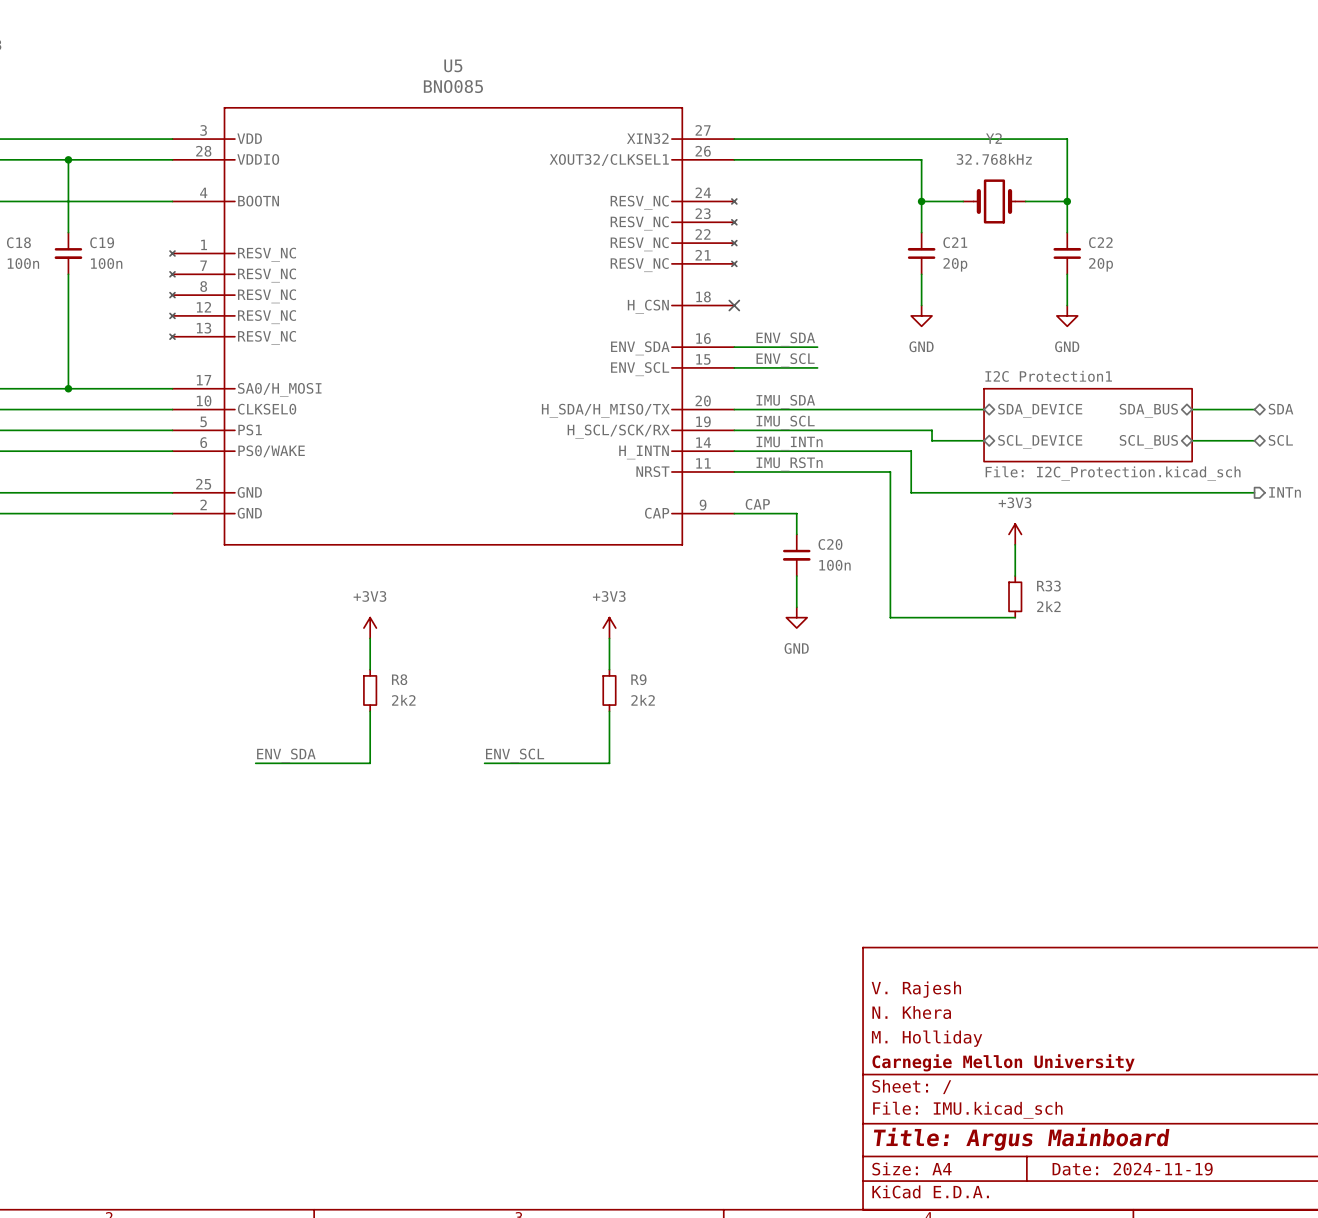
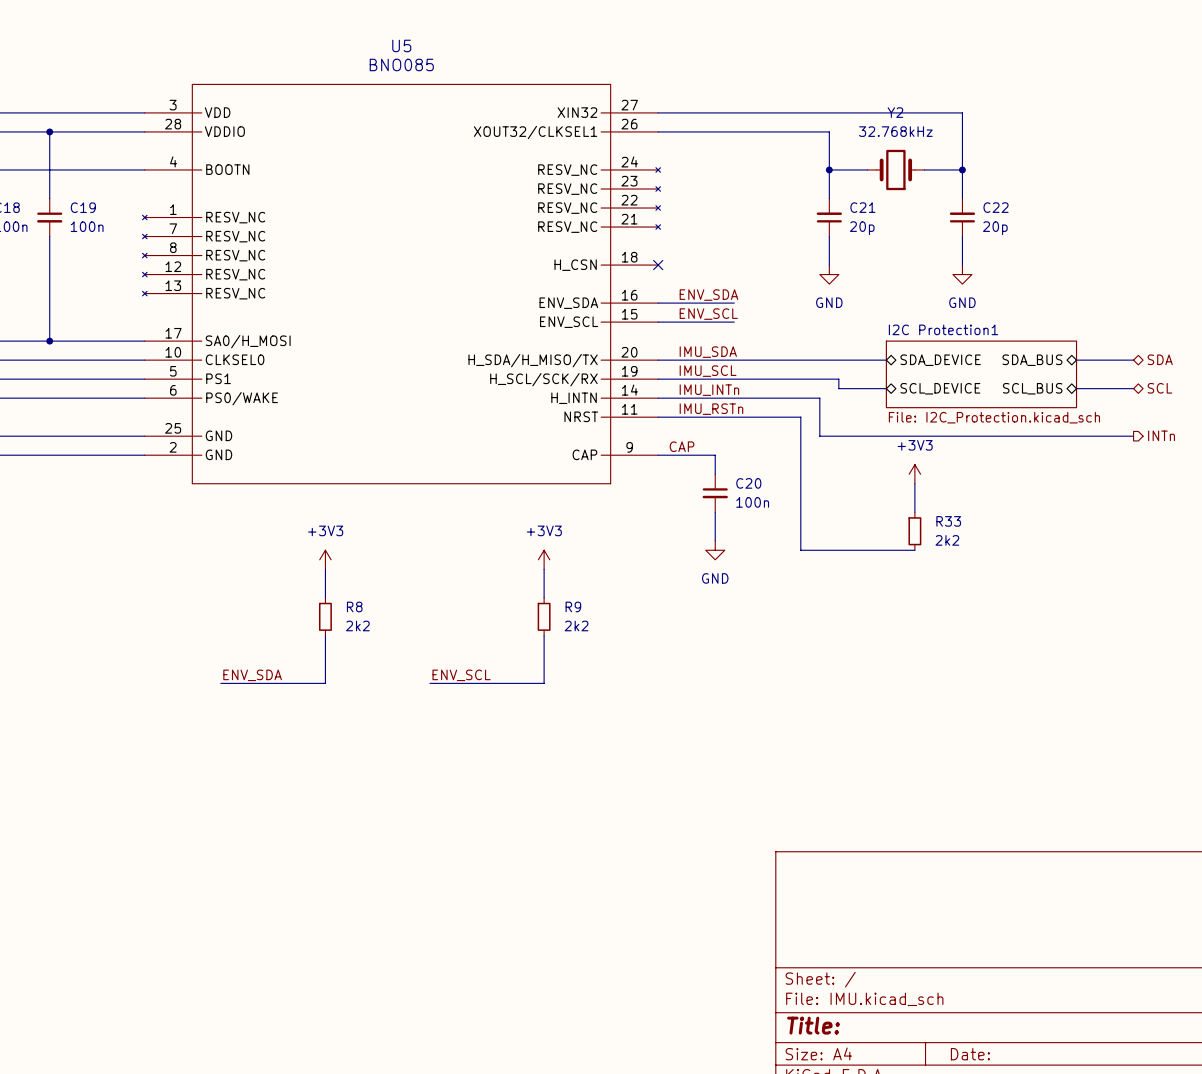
title block: V. Rajesh (916, 989) -> none
title block: N. Khera (911, 1012) -> none
title block: M. Holliday (927, 1038) -> none
title block: Carnegie Mellon University (1003, 1062) -> none
title block: Title: Argus Mainboard (1021, 1139) -> Title: (813, 1025)
title block: Date: 2024-11-19 (1132, 1169) -> Date: (970, 1054)

